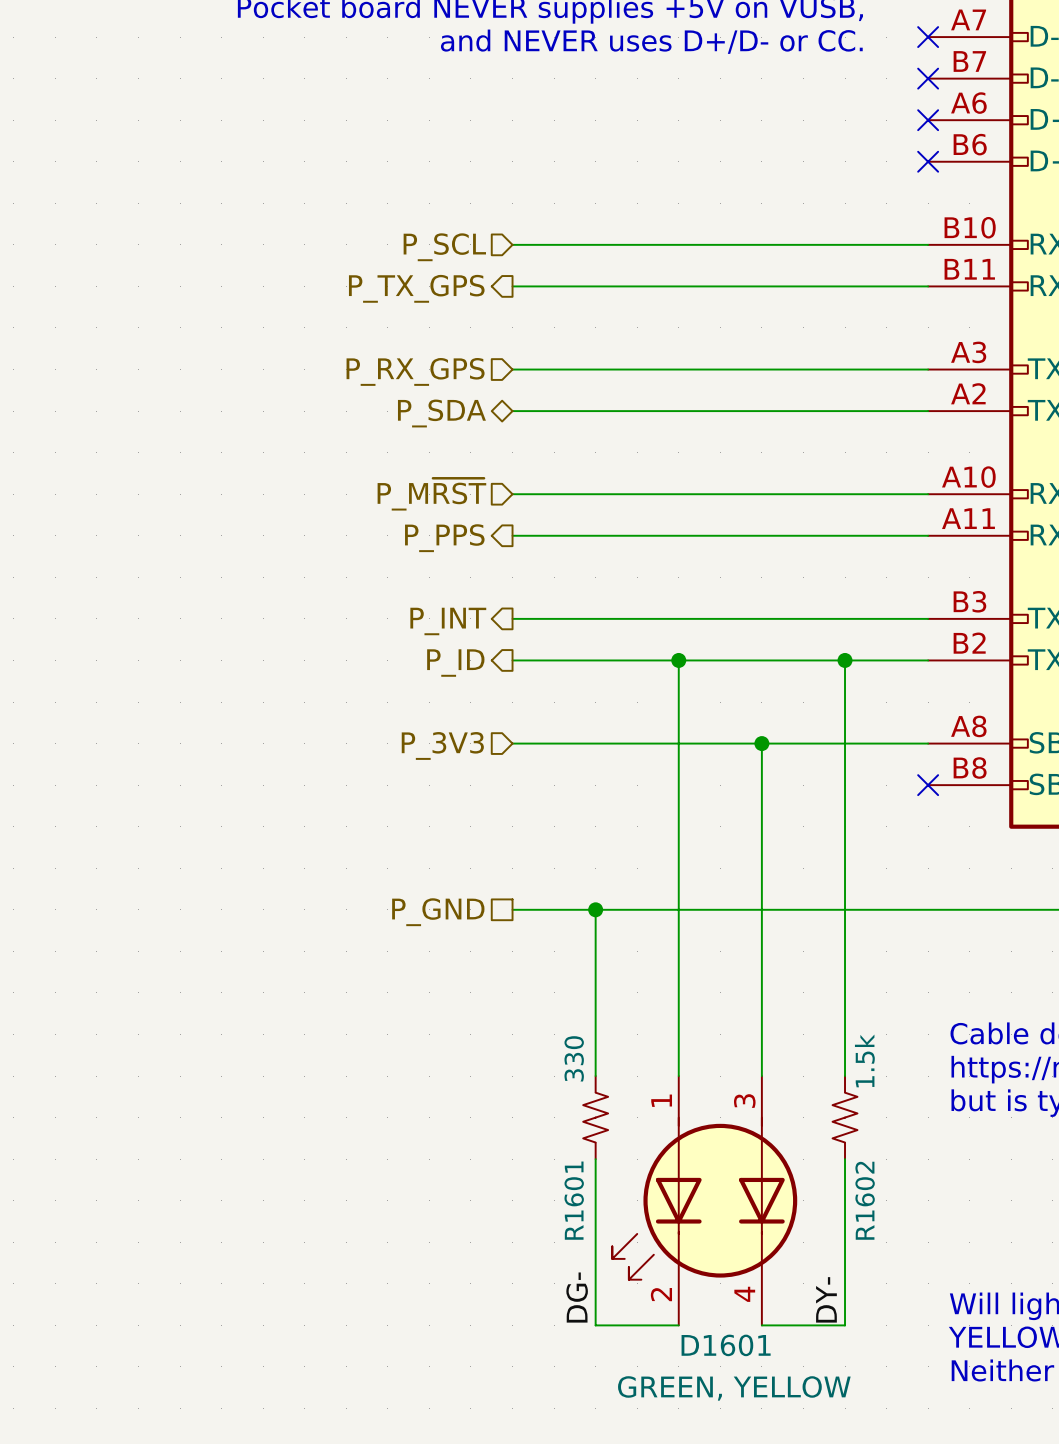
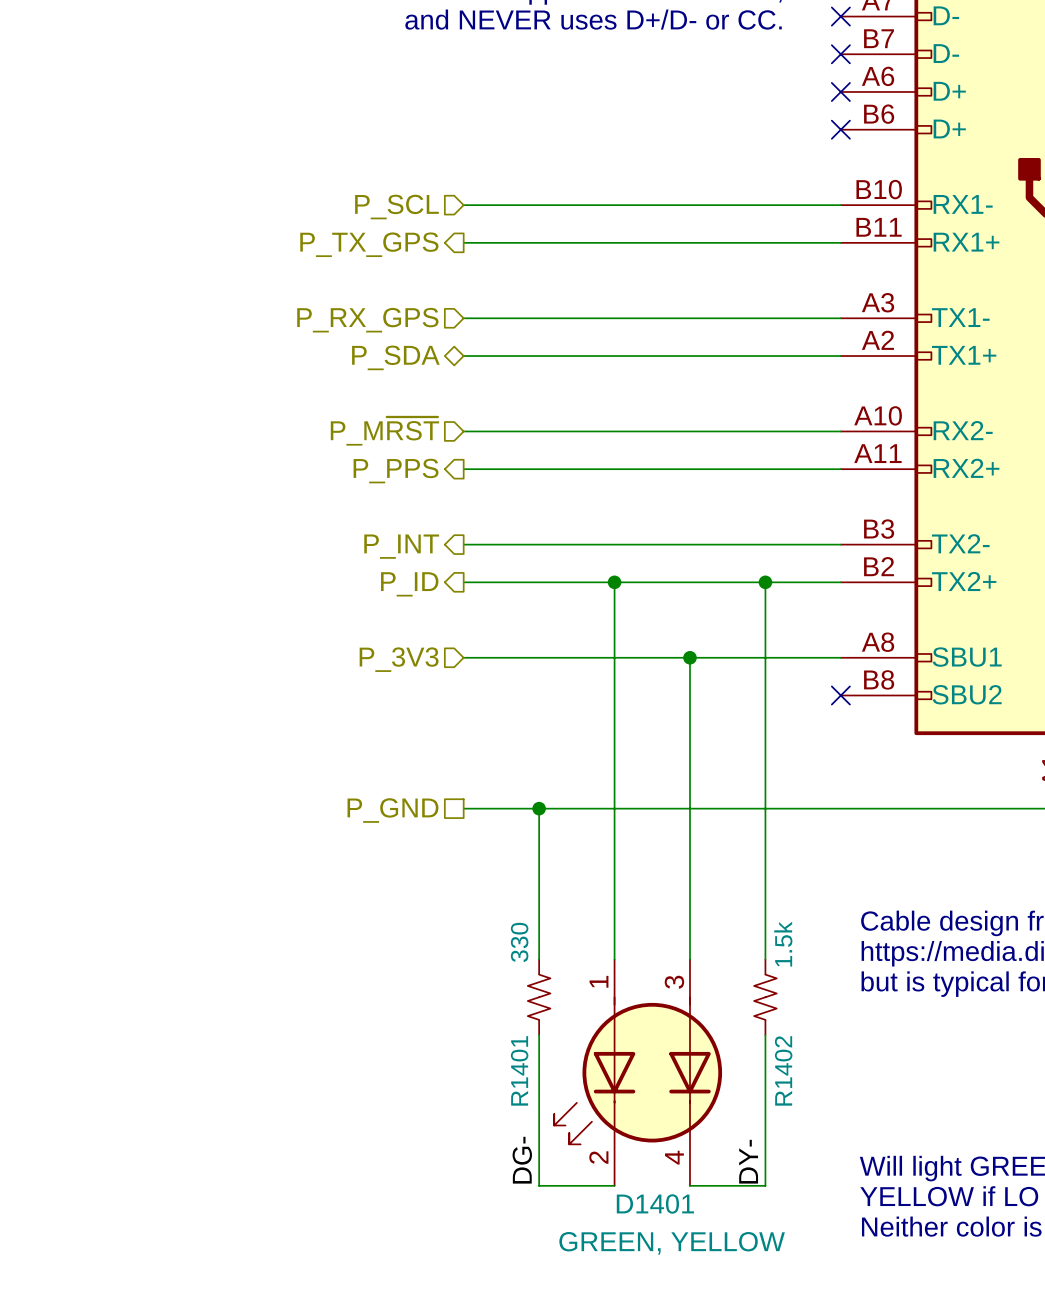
R1601 name: R1601 (574, 1200) -> R1401 (519, 1070)
R1602 name: R1602 (865, 1200) -> R1402 (783, 1070)
D1601 name: D1601 (726, 1345) -> D1401 (655, 1203)

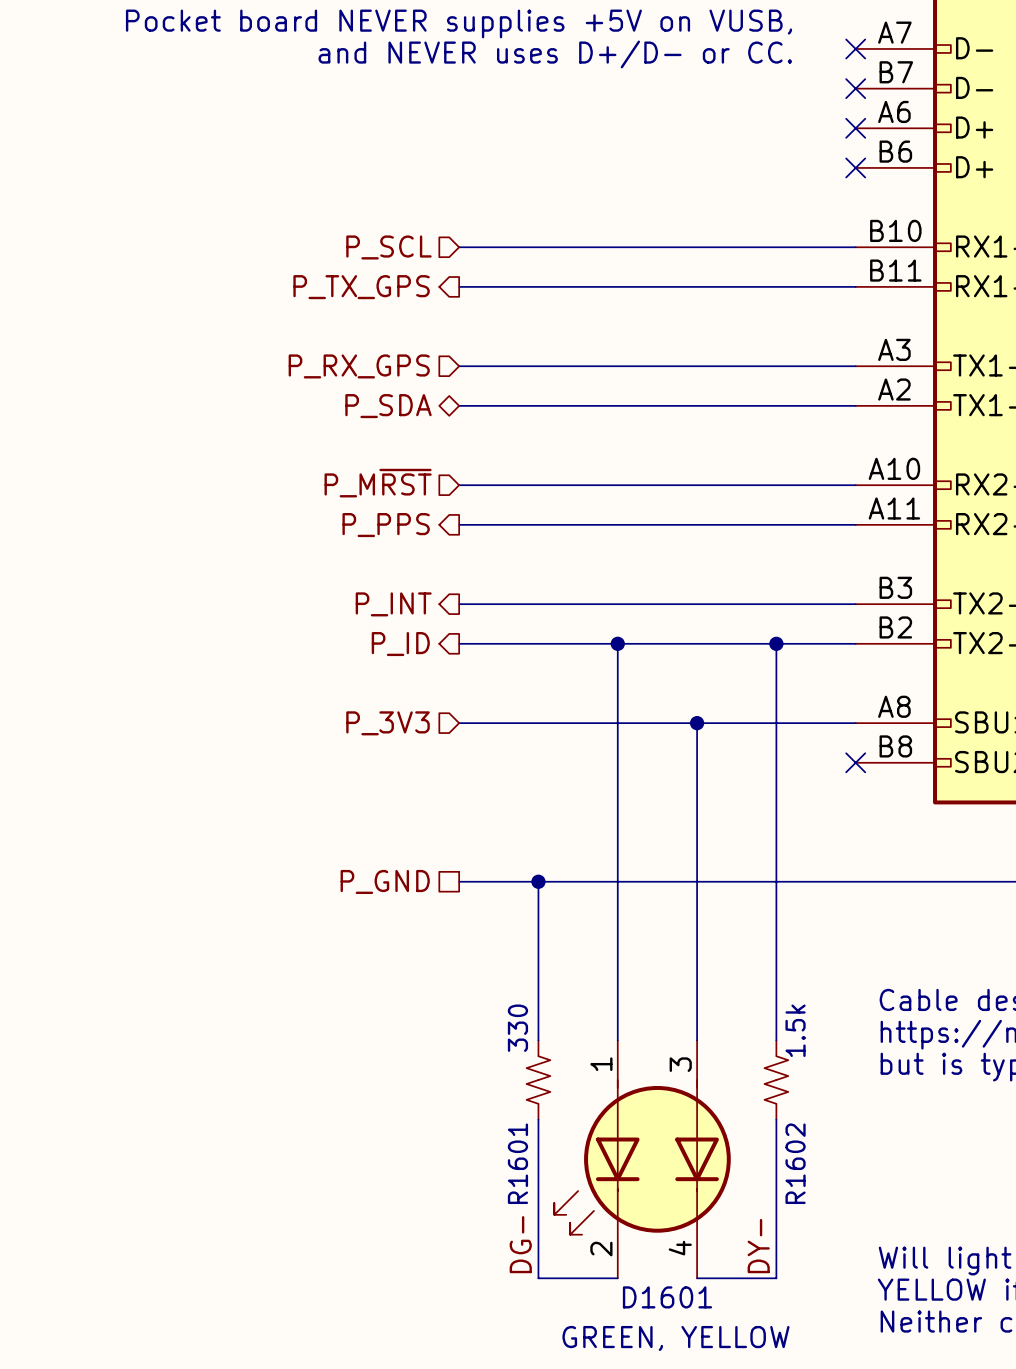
R1401 name: R1401 (519, 1070) -> R1601 (517, 1163)
R1402 name: R1402 (783, 1070) -> R1602 (795, 1163)
D1401 name: D1401 (655, 1203) -> D1601 (667, 1297)

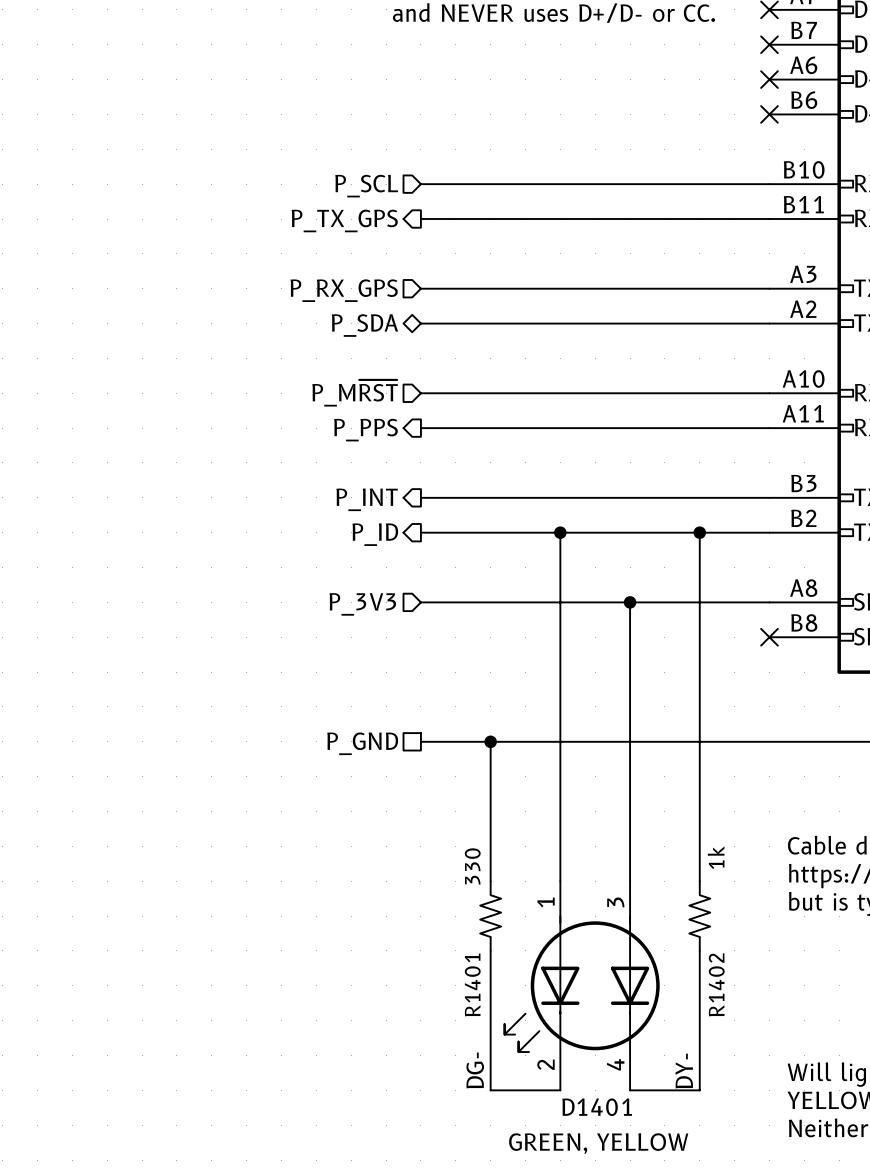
R1602 value: 1.5k (795, 1030) -> 1k (716, 857)
R1601 name: R1601 (517, 1163) -> R1401 (472, 984)
R1602 name: R1602 (795, 1163) -> R1402 (716, 984)
D1601 name: D1601 (667, 1297) -> D1401 (597, 1107)

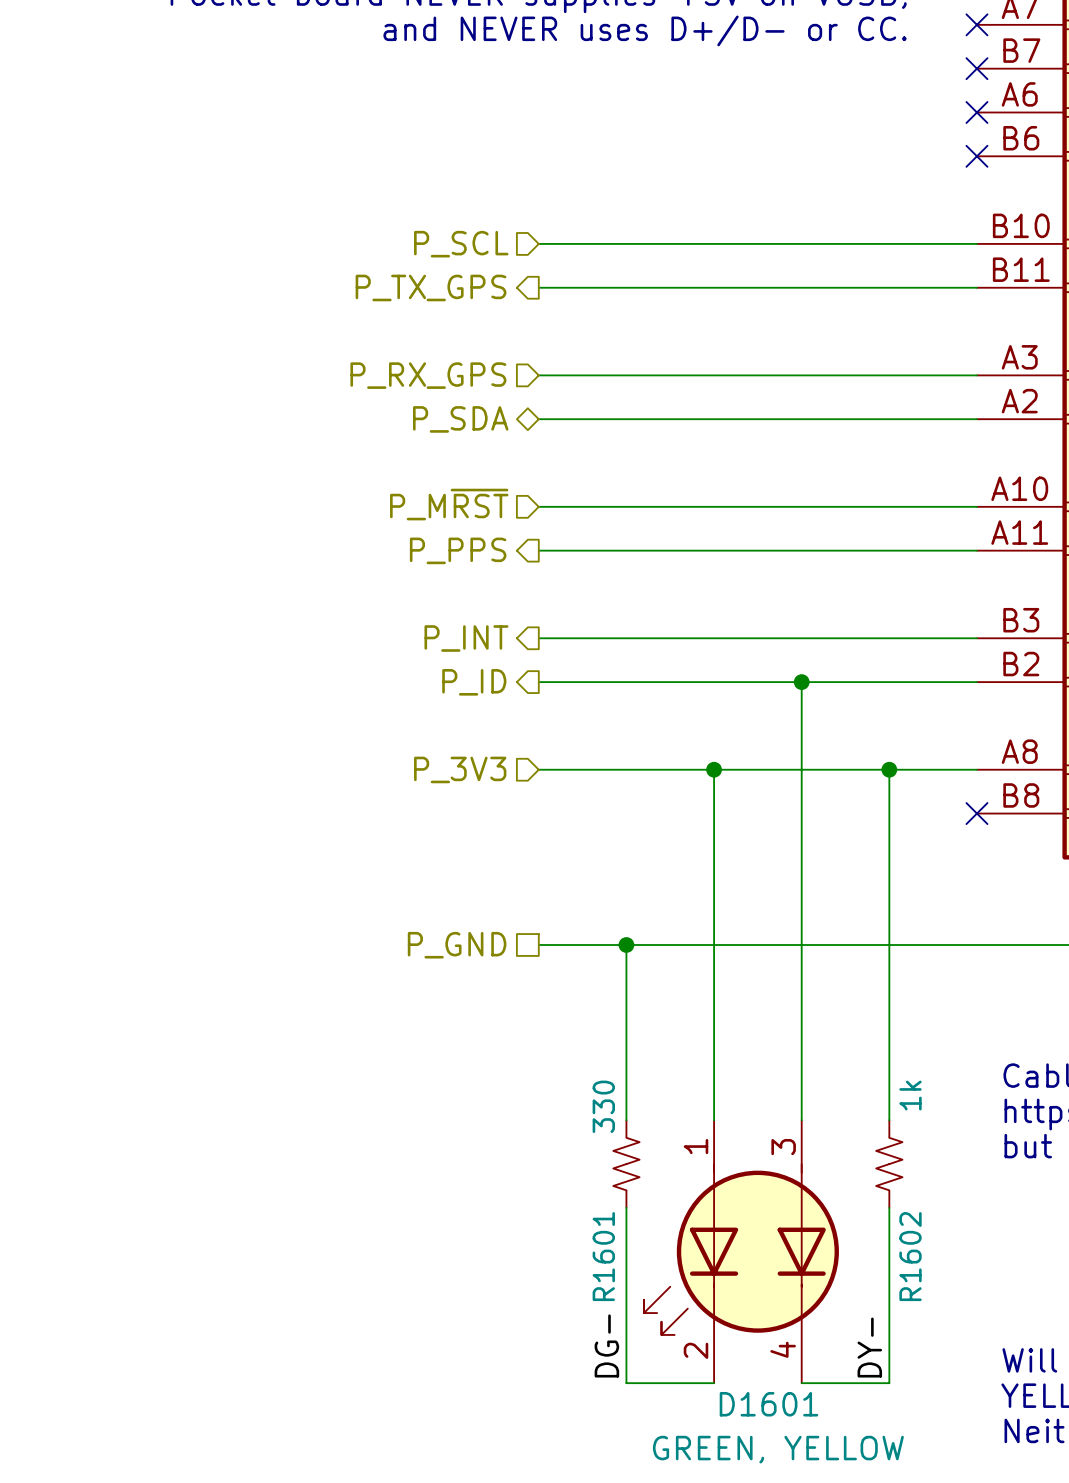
wire: (560, 532) (560, 602) -> (801, 682) (801, 769)
junction: (560, 532) -> none
junction: none -> (801, 682)
wire: (699, 532) (699, 602) -> none
junction: (699, 532) -> none
junction: none -> (714, 769)
junction: (630, 602) -> none
junction: none -> (889, 769)
R1401 name: R1401 (472, 984) -> R1601 (603, 1256)
R1402 name: R1402 (716, 984) -> R1602 (910, 1256)
D1401 name: D1401 (597, 1107) -> D1601 (769, 1404)

